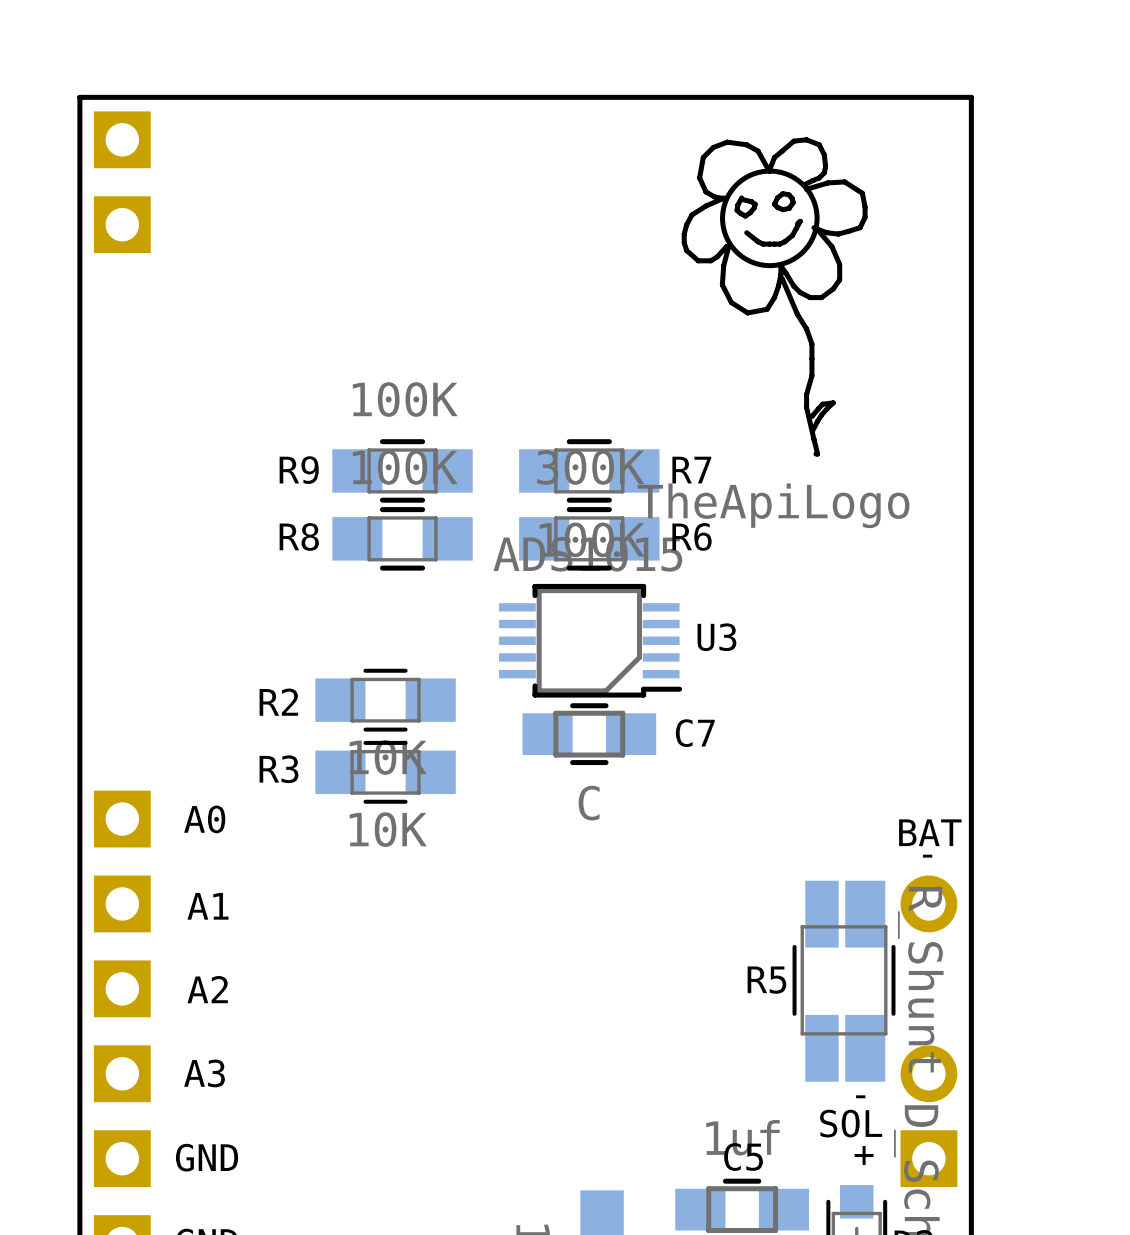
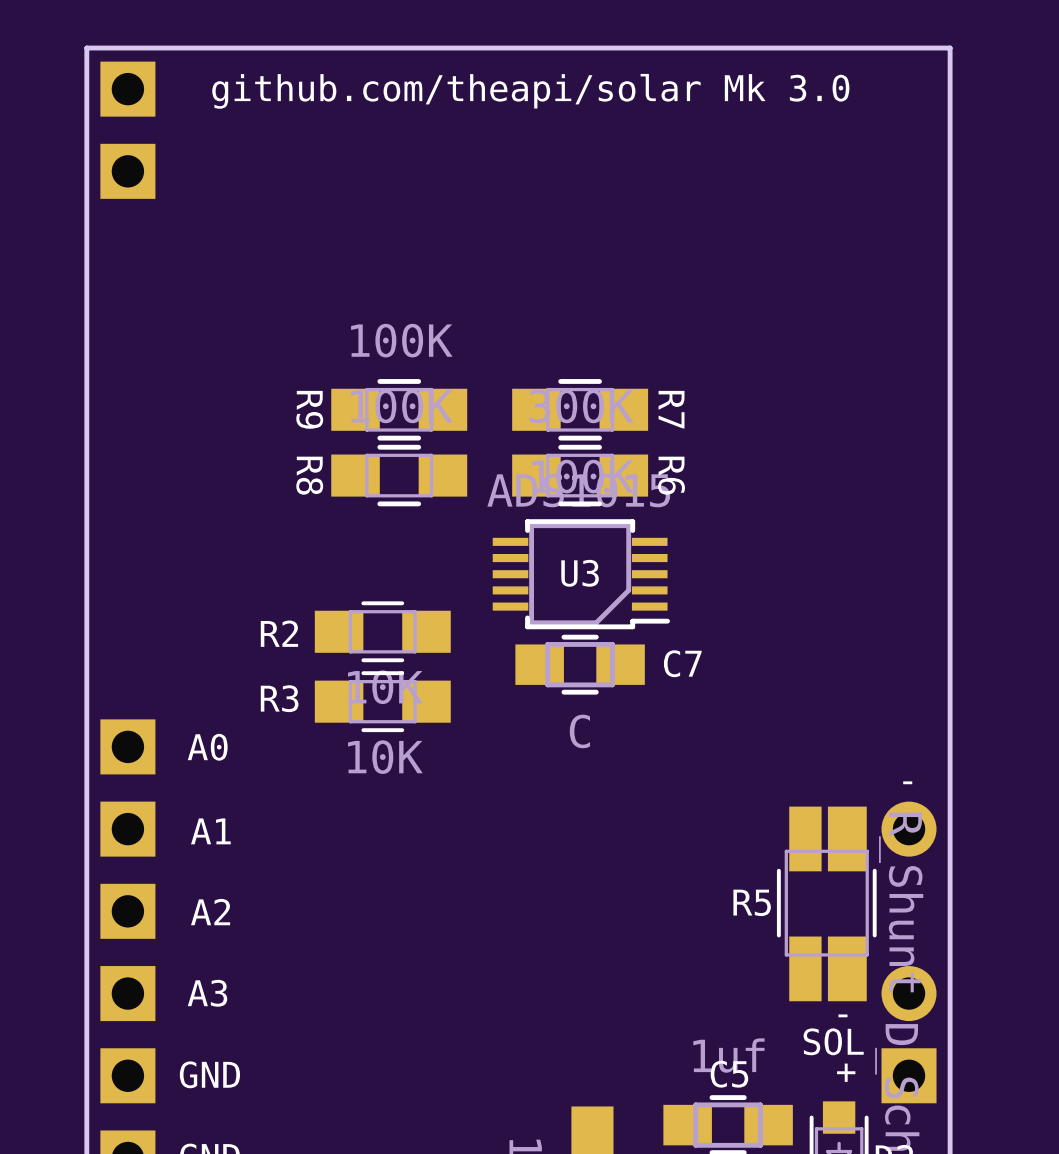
drawing: [681, 137, 868, 457] -> none
text: none -> github.com/theapi/solar Mk 3.0 (530, 91)
R9 name rotation: 0° (299, 470) -> 90° clockwise (309, 409)
R7 name rotation: 0° (691, 470) -> 90° clockwise (671, 409)
R8 name rotation: 0° (299, 536) -> 90° clockwise (309, 475)
R6 name rotation: 0° (692, 536) -> 90° clockwise (671, 475)
U3 name position: U3 (716, 637) -> U3 (580, 573)
text: BAT (930, 832) -> none

